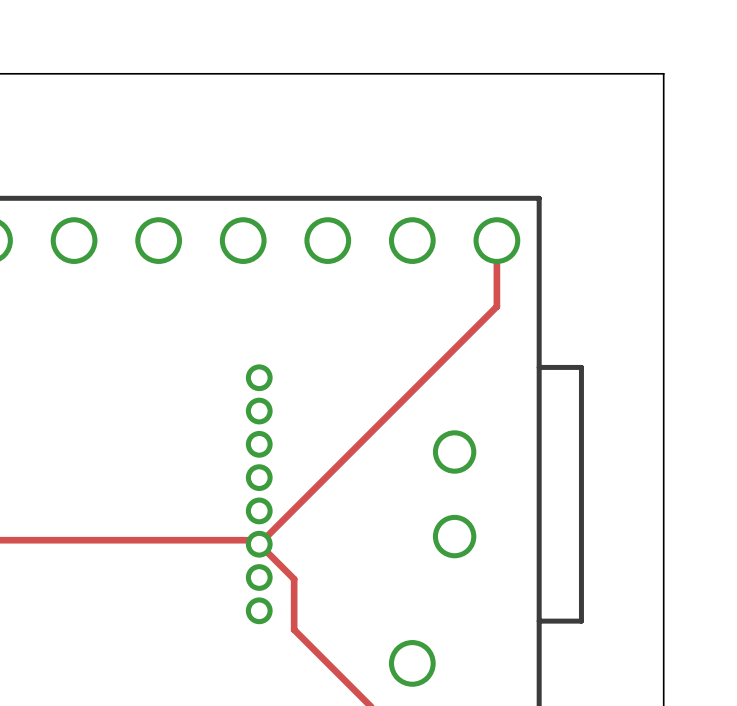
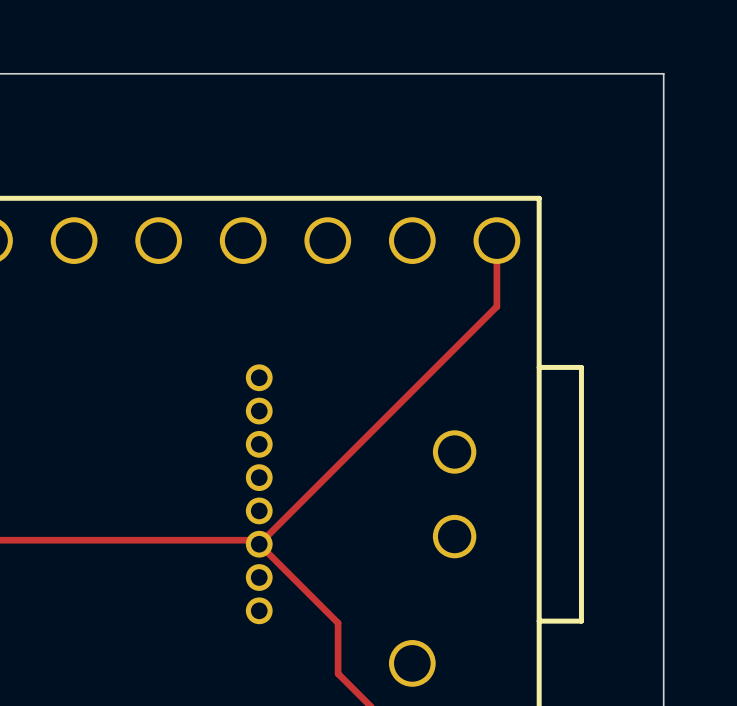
top track: (294, 579) (294, 629) (338, 673) -> (294, 579) (338, 623) (338, 673)

